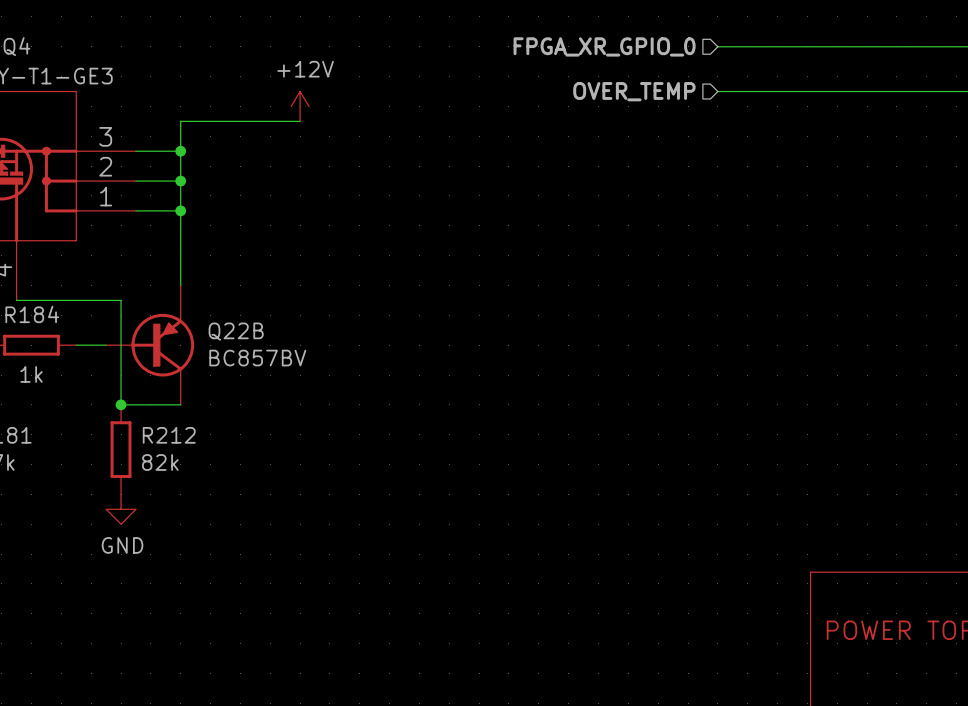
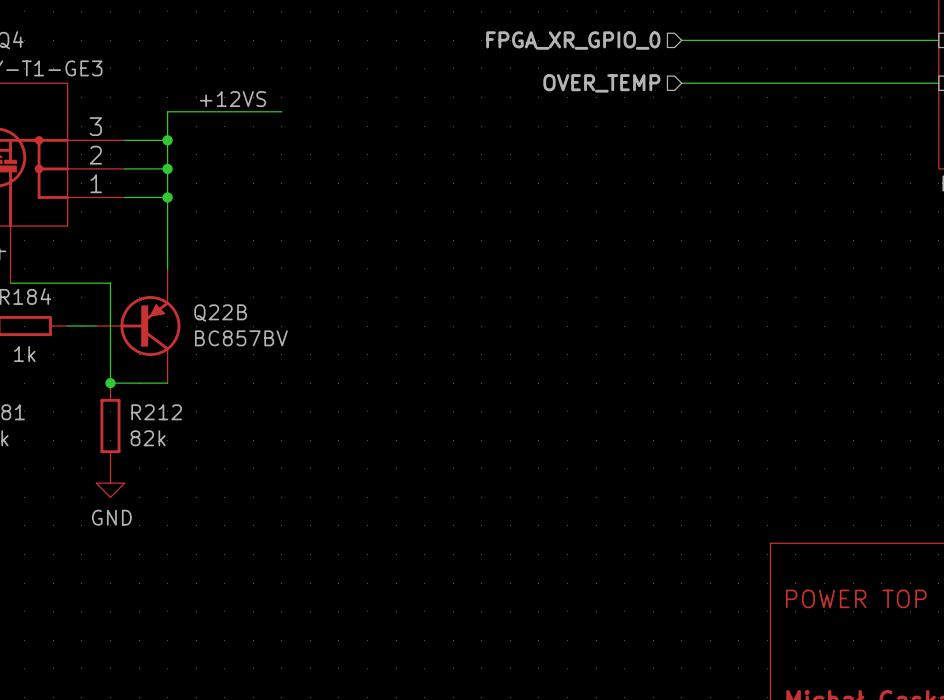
power symbol: +12V (300, 106) -> none
label: none -> +12VS (232, 99)

